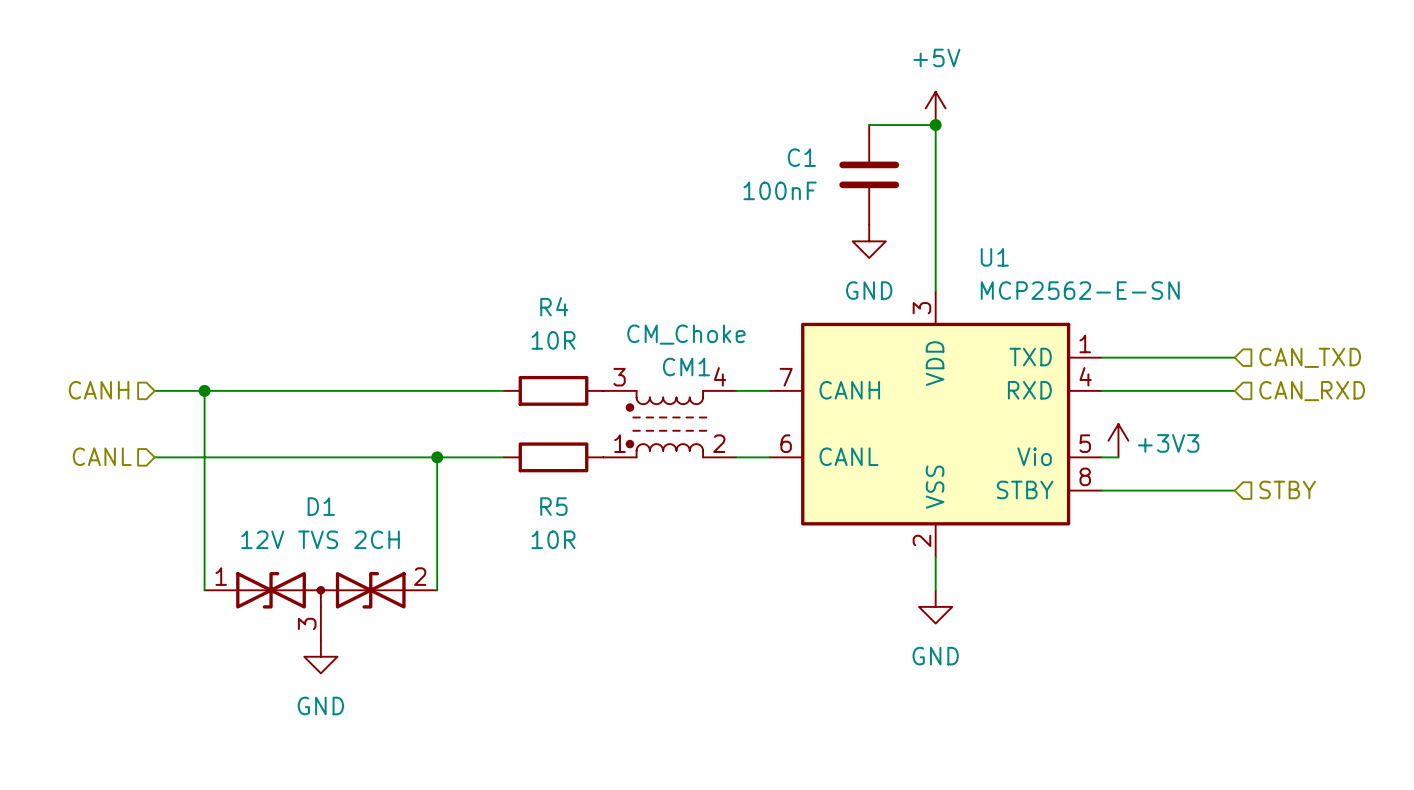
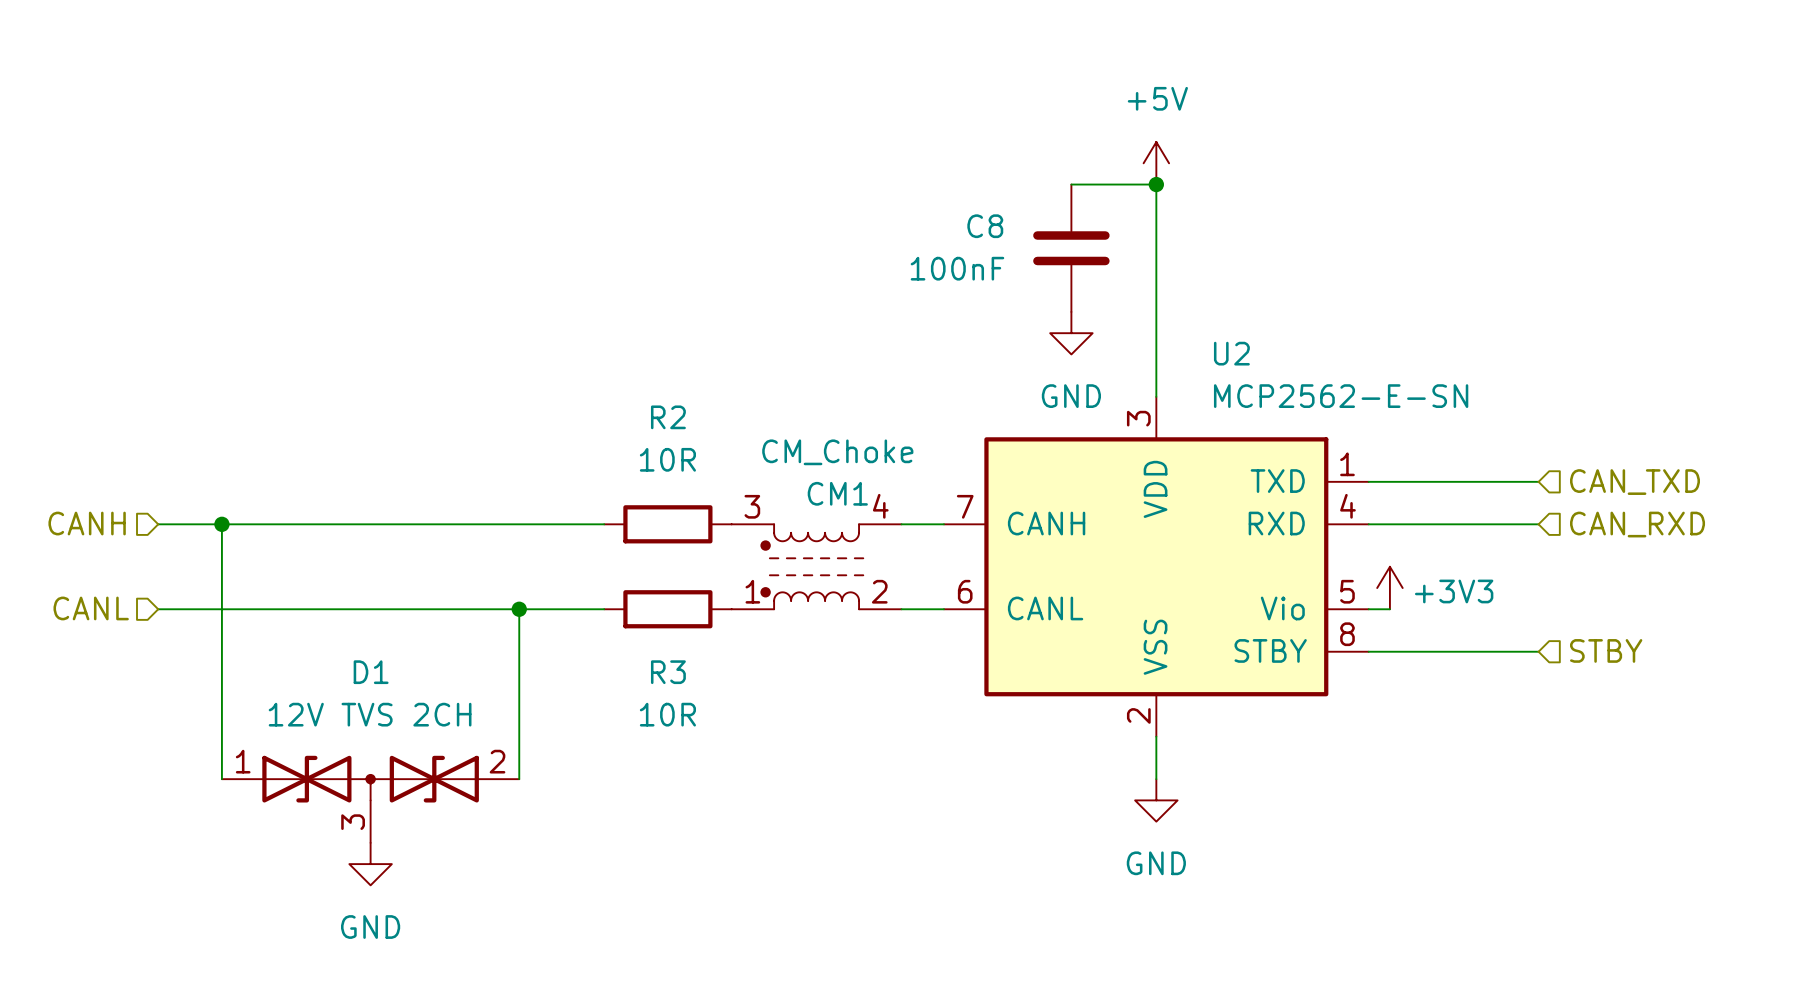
C1 name: C1 (801, 157) -> C8 (985, 226)
U1 name: U1 (994, 257) -> U2 (1231, 353)
R4 name: R4 (554, 306) -> R2 (668, 417)
R5 name: R5 (553, 506) -> R3 (668, 672)

